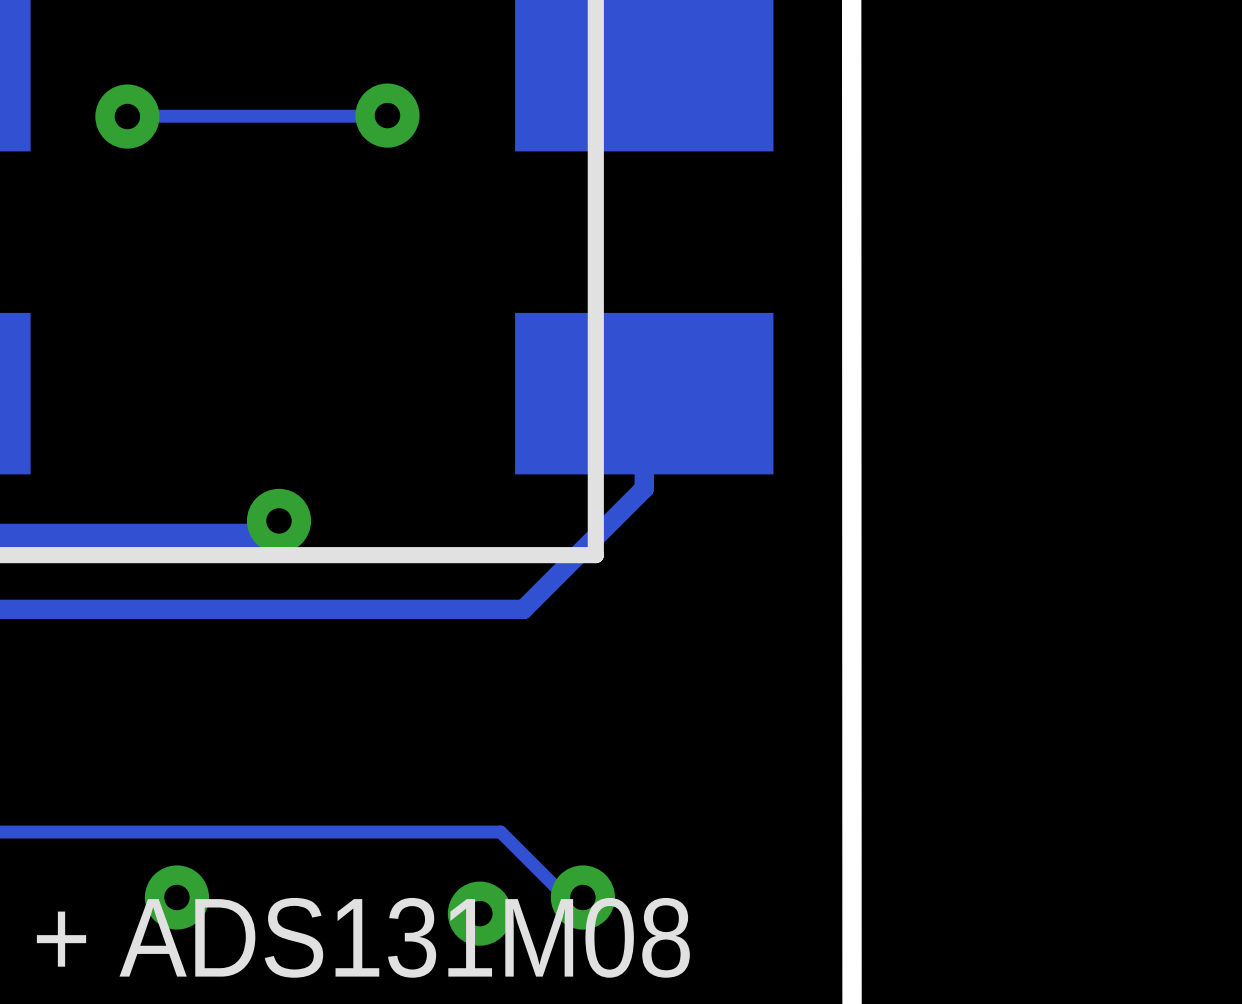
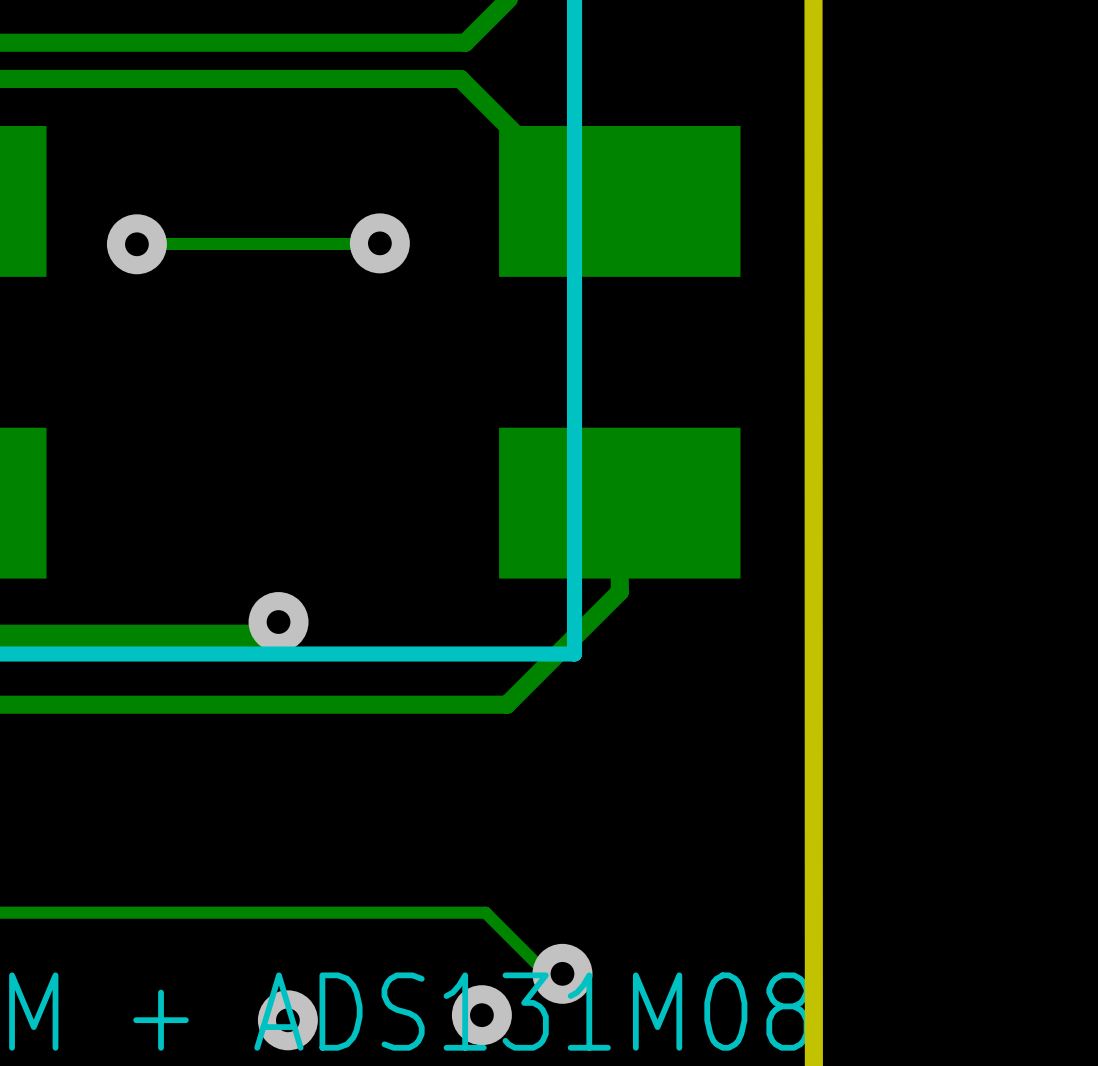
via: (176, 897) -> none
via position: (479, 913) -> (481, 1015)
via: none -> (287, 1020)

